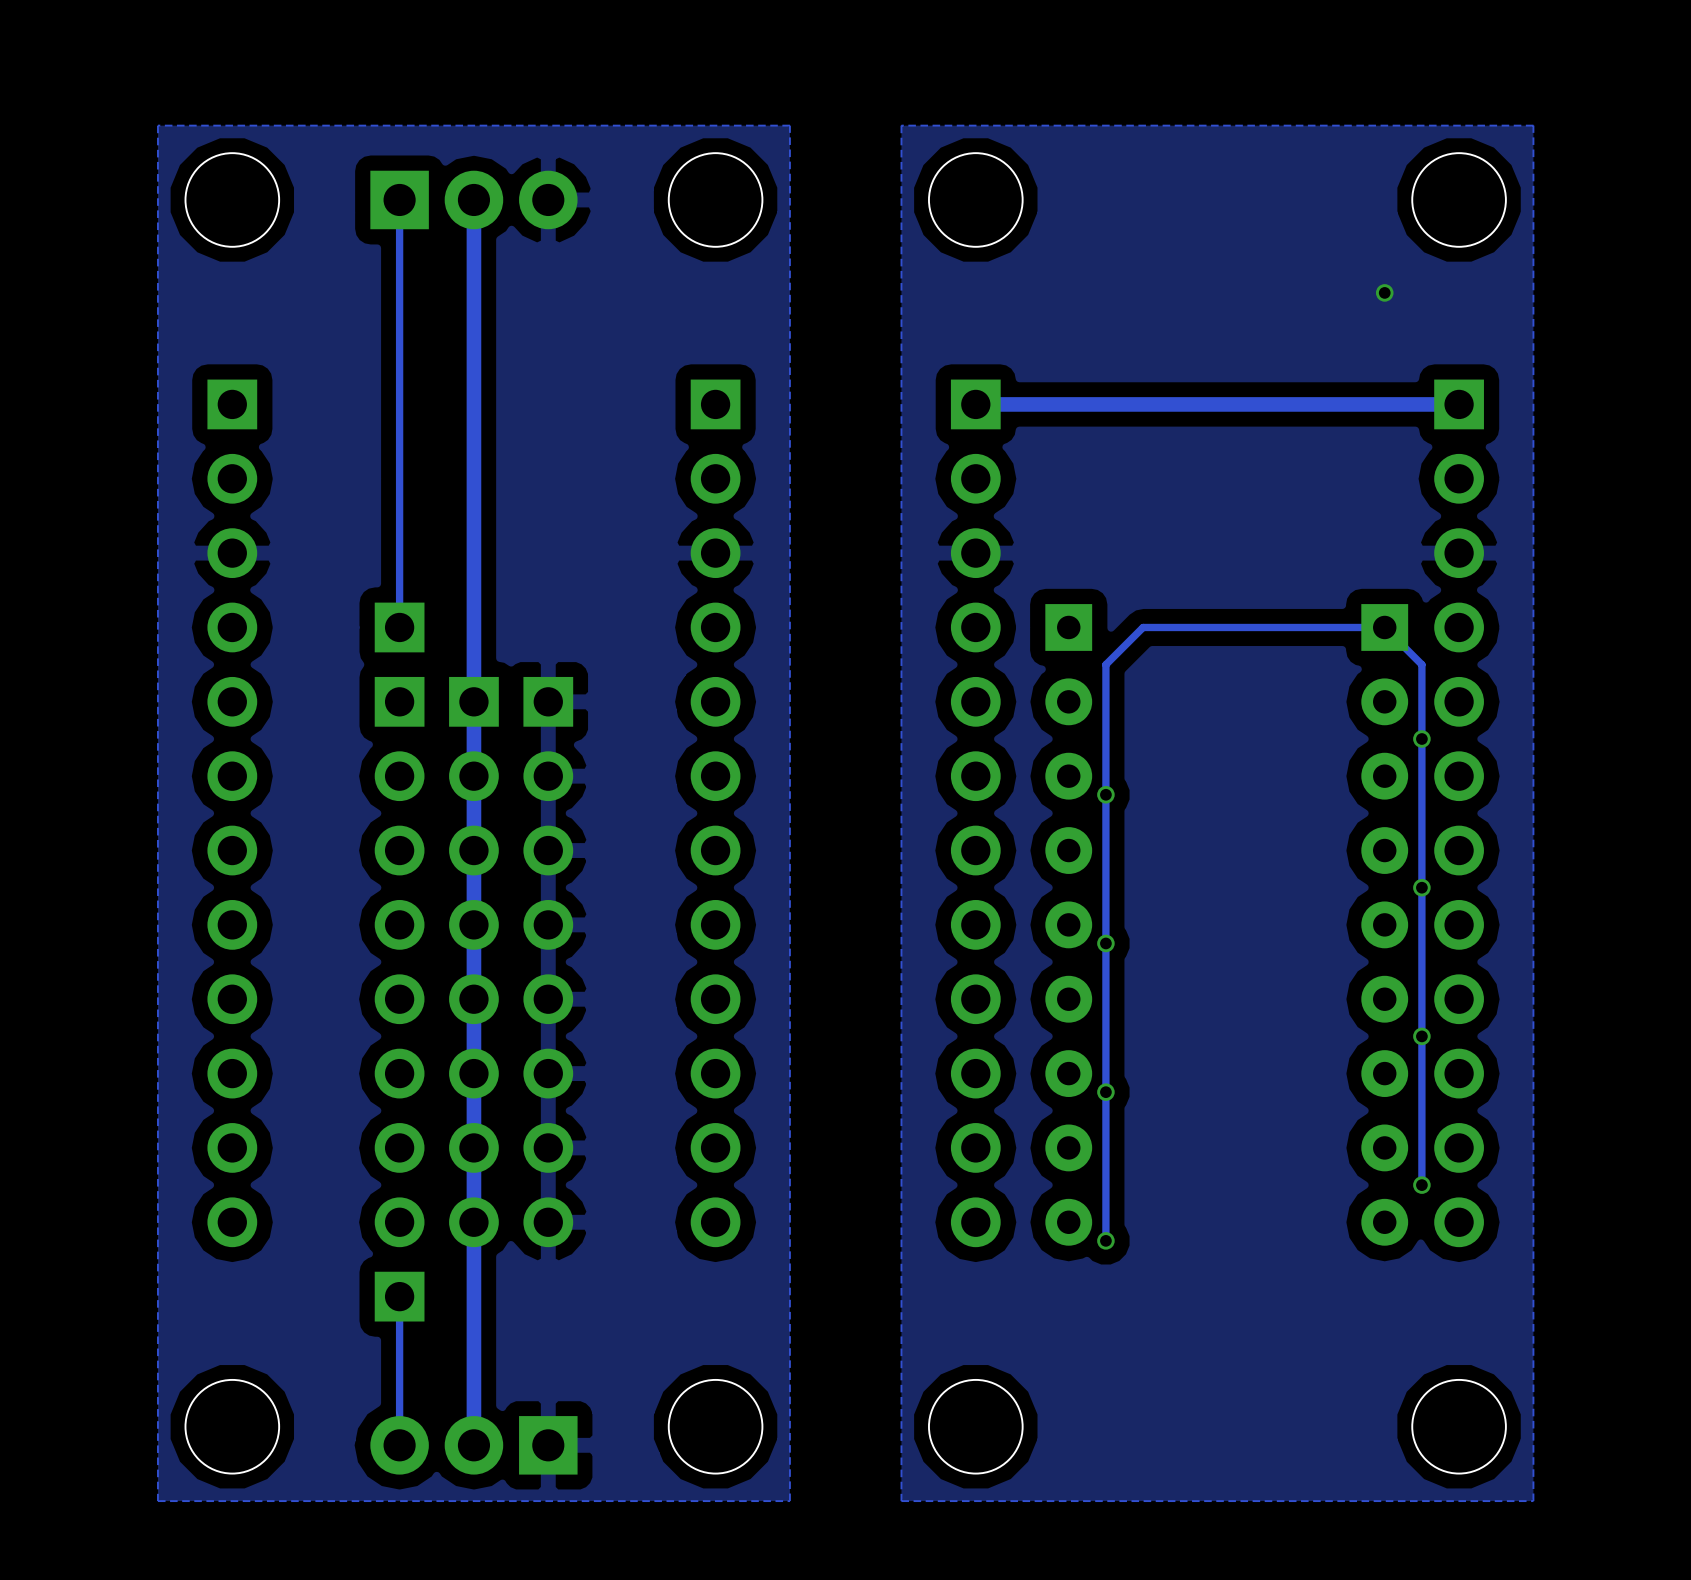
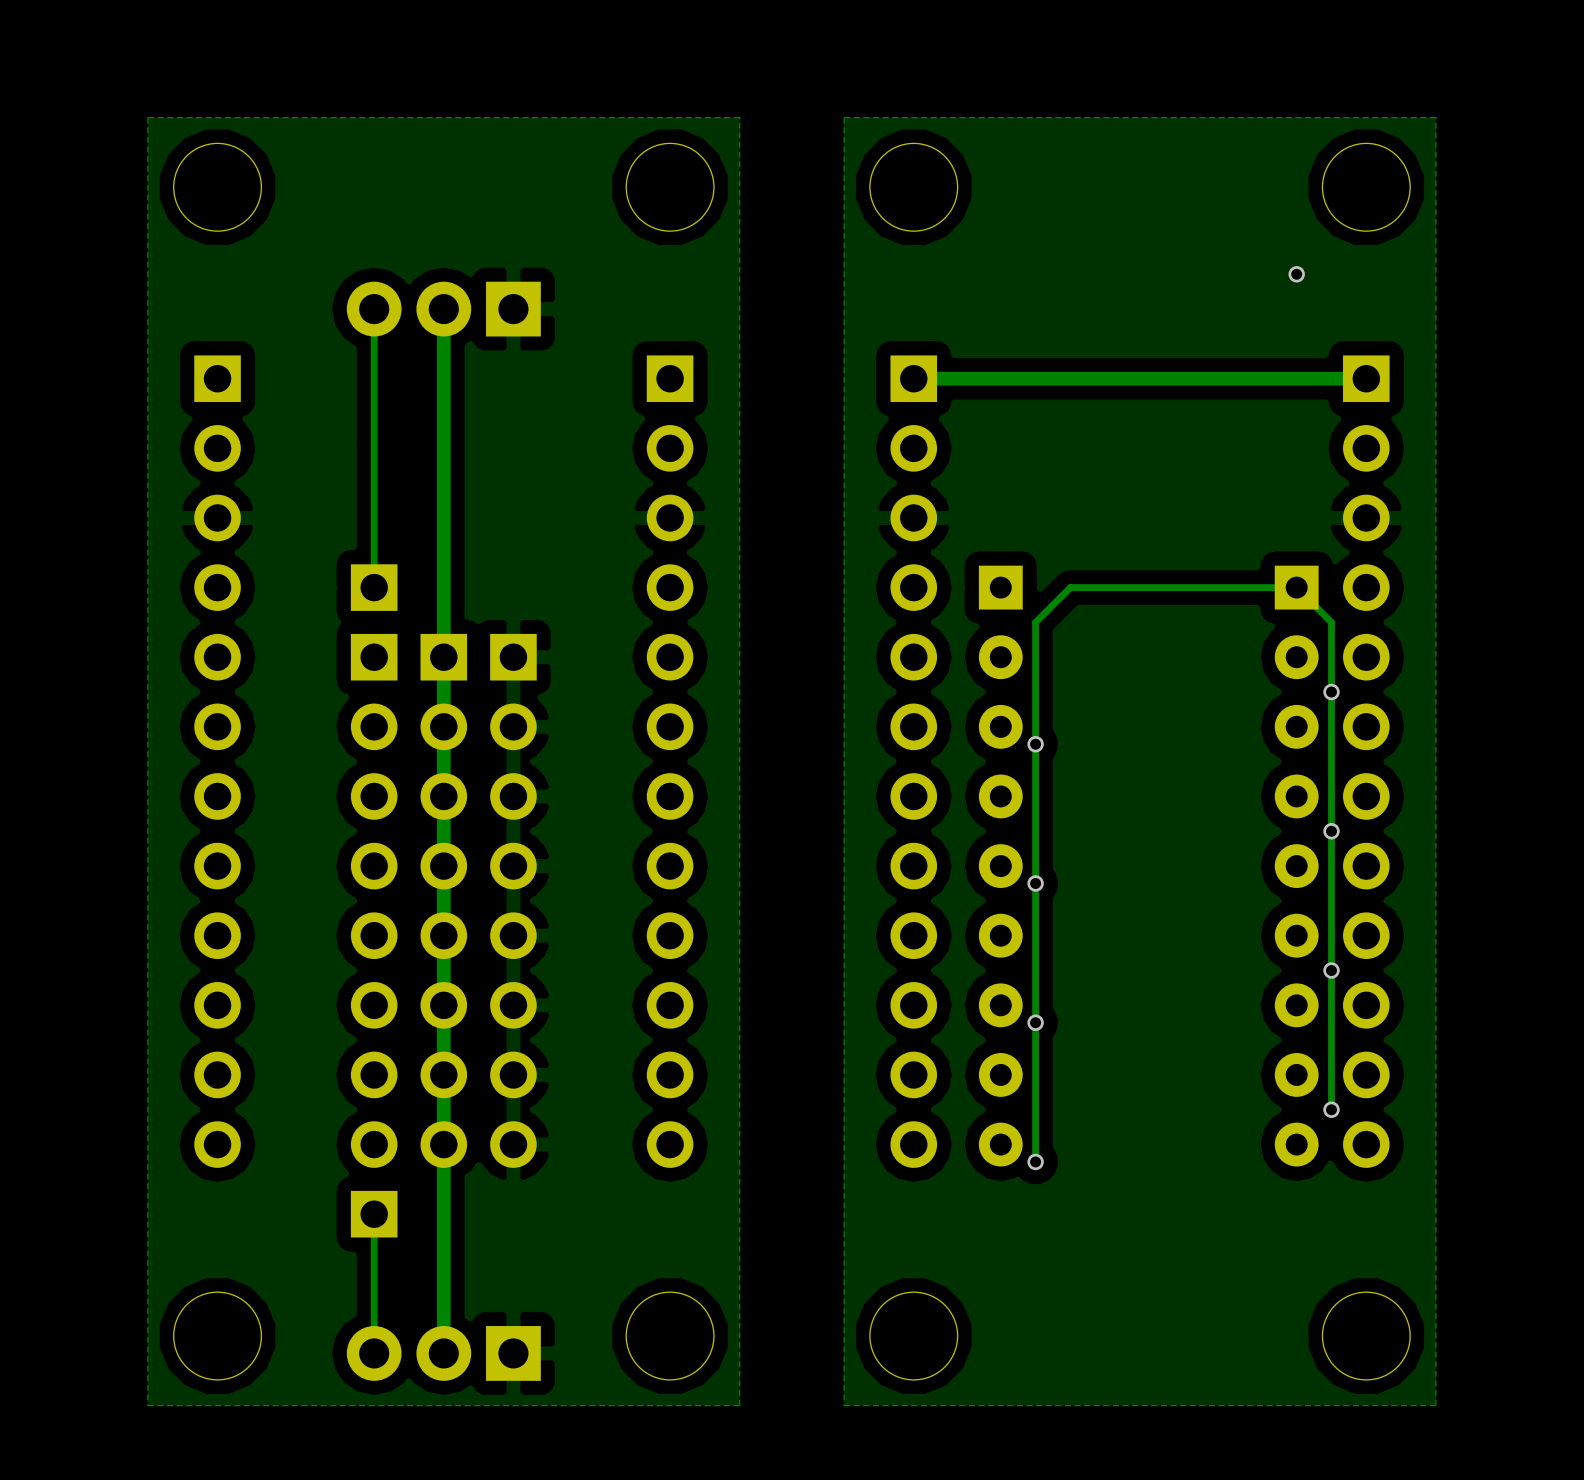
track: (399, 199) (399, 330) -> none
track: (473, 199) (473, 330) -> none
part rotation: 0° (473, 199) -> 180° (443, 309)
part position: (473, 199) -> (443, 309)

